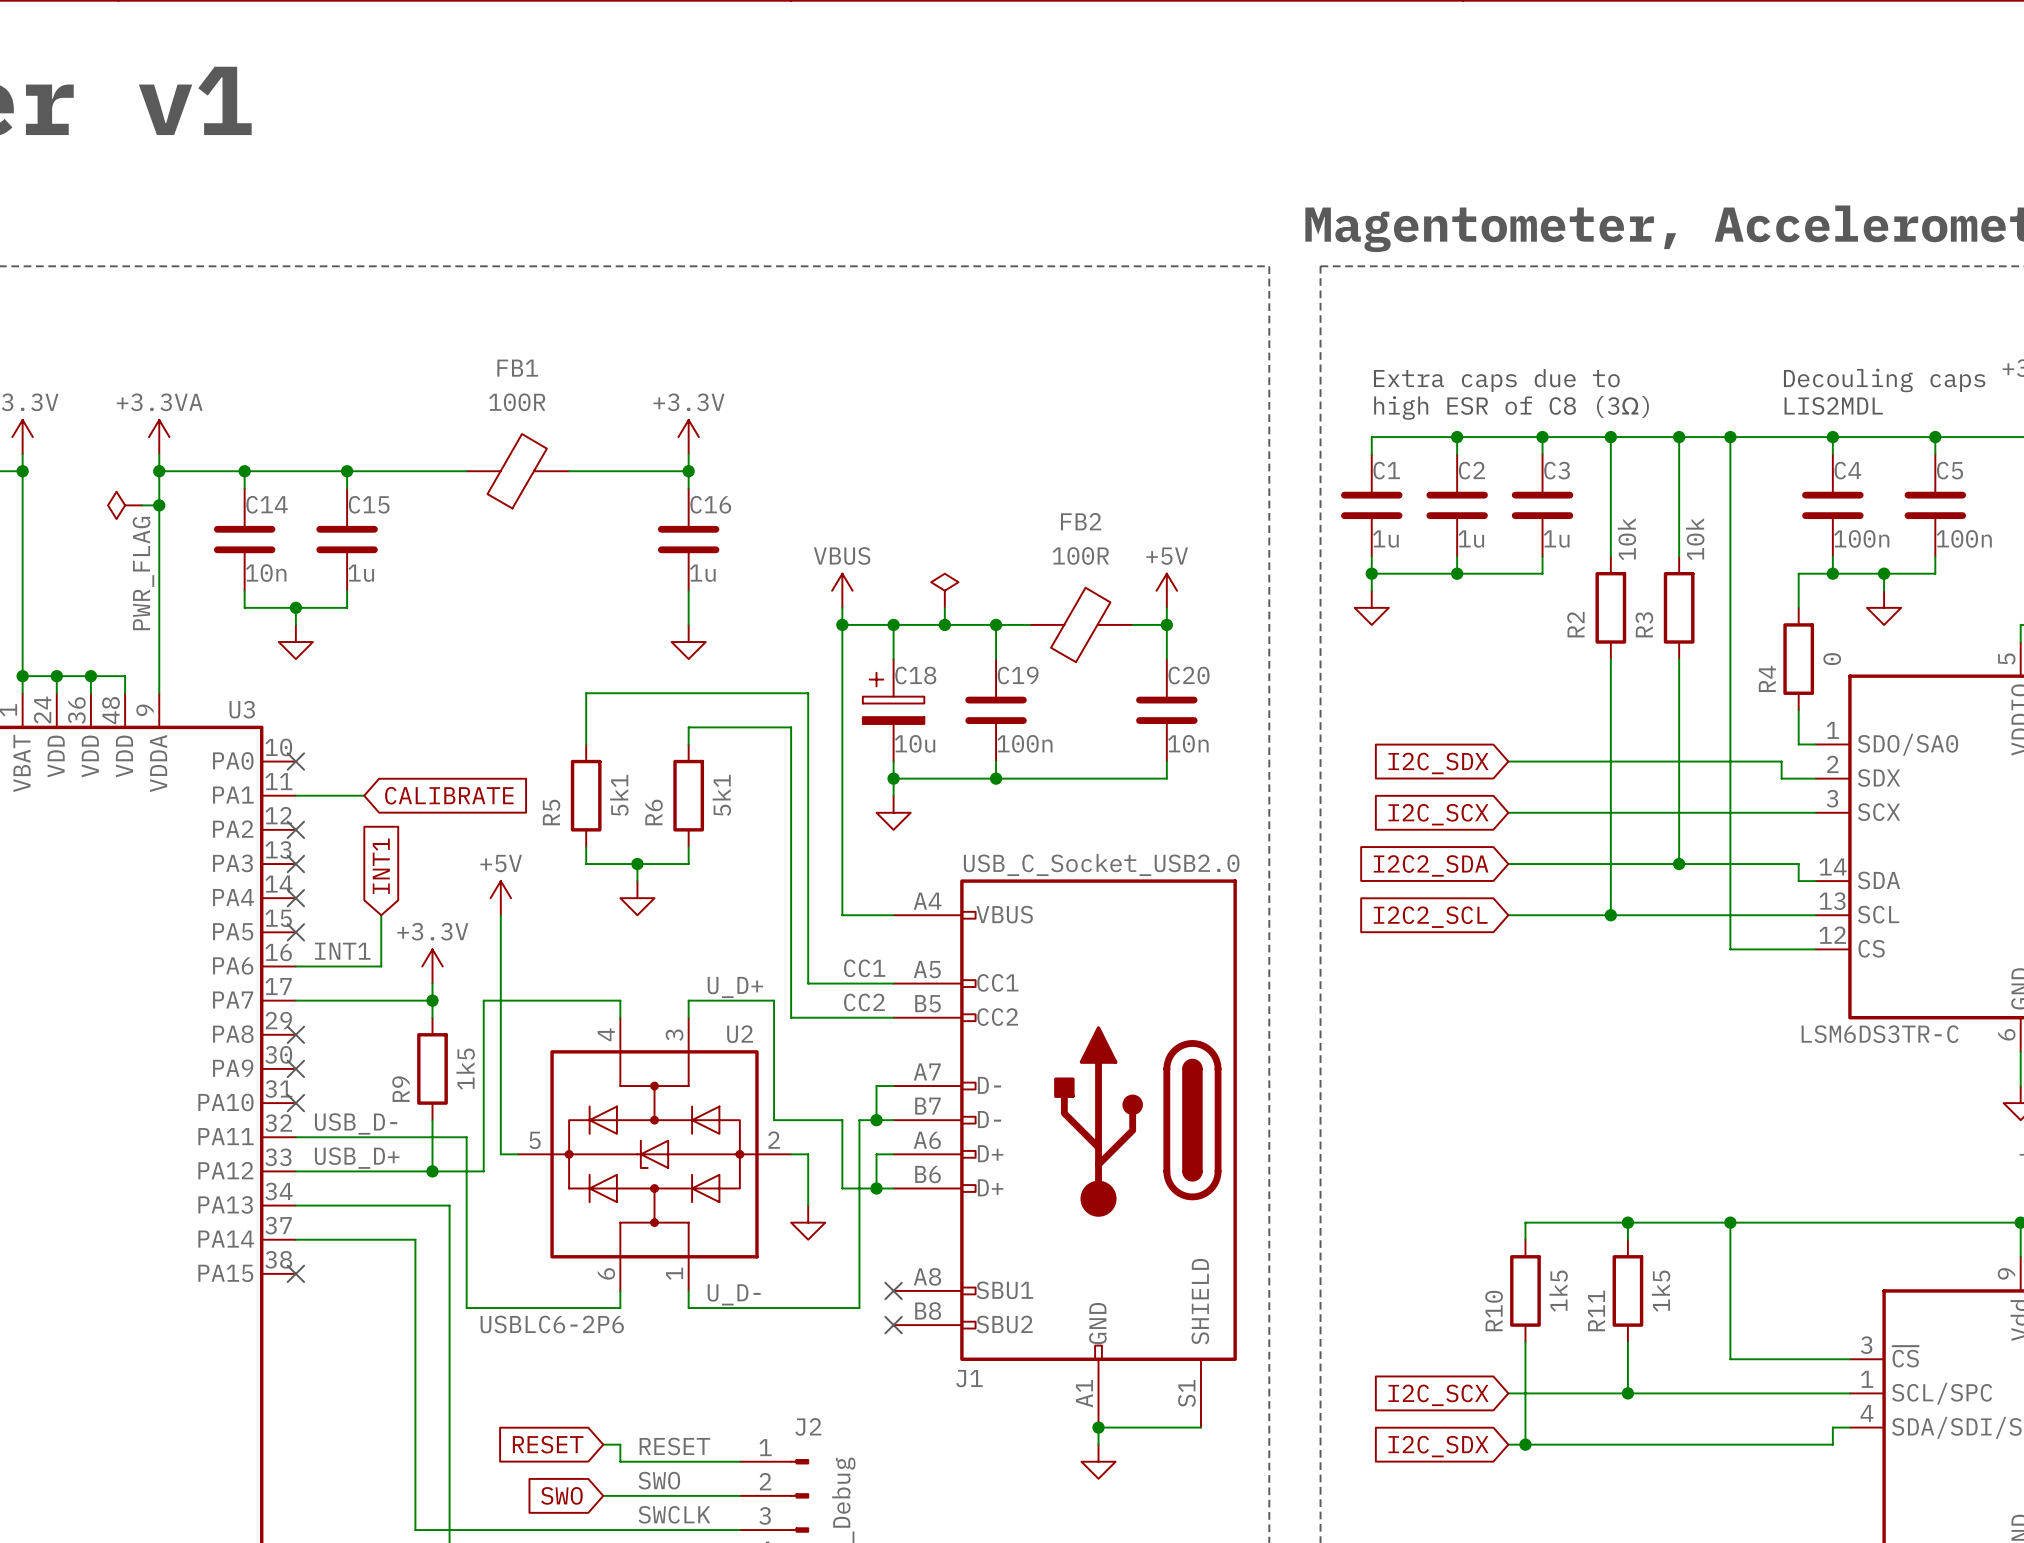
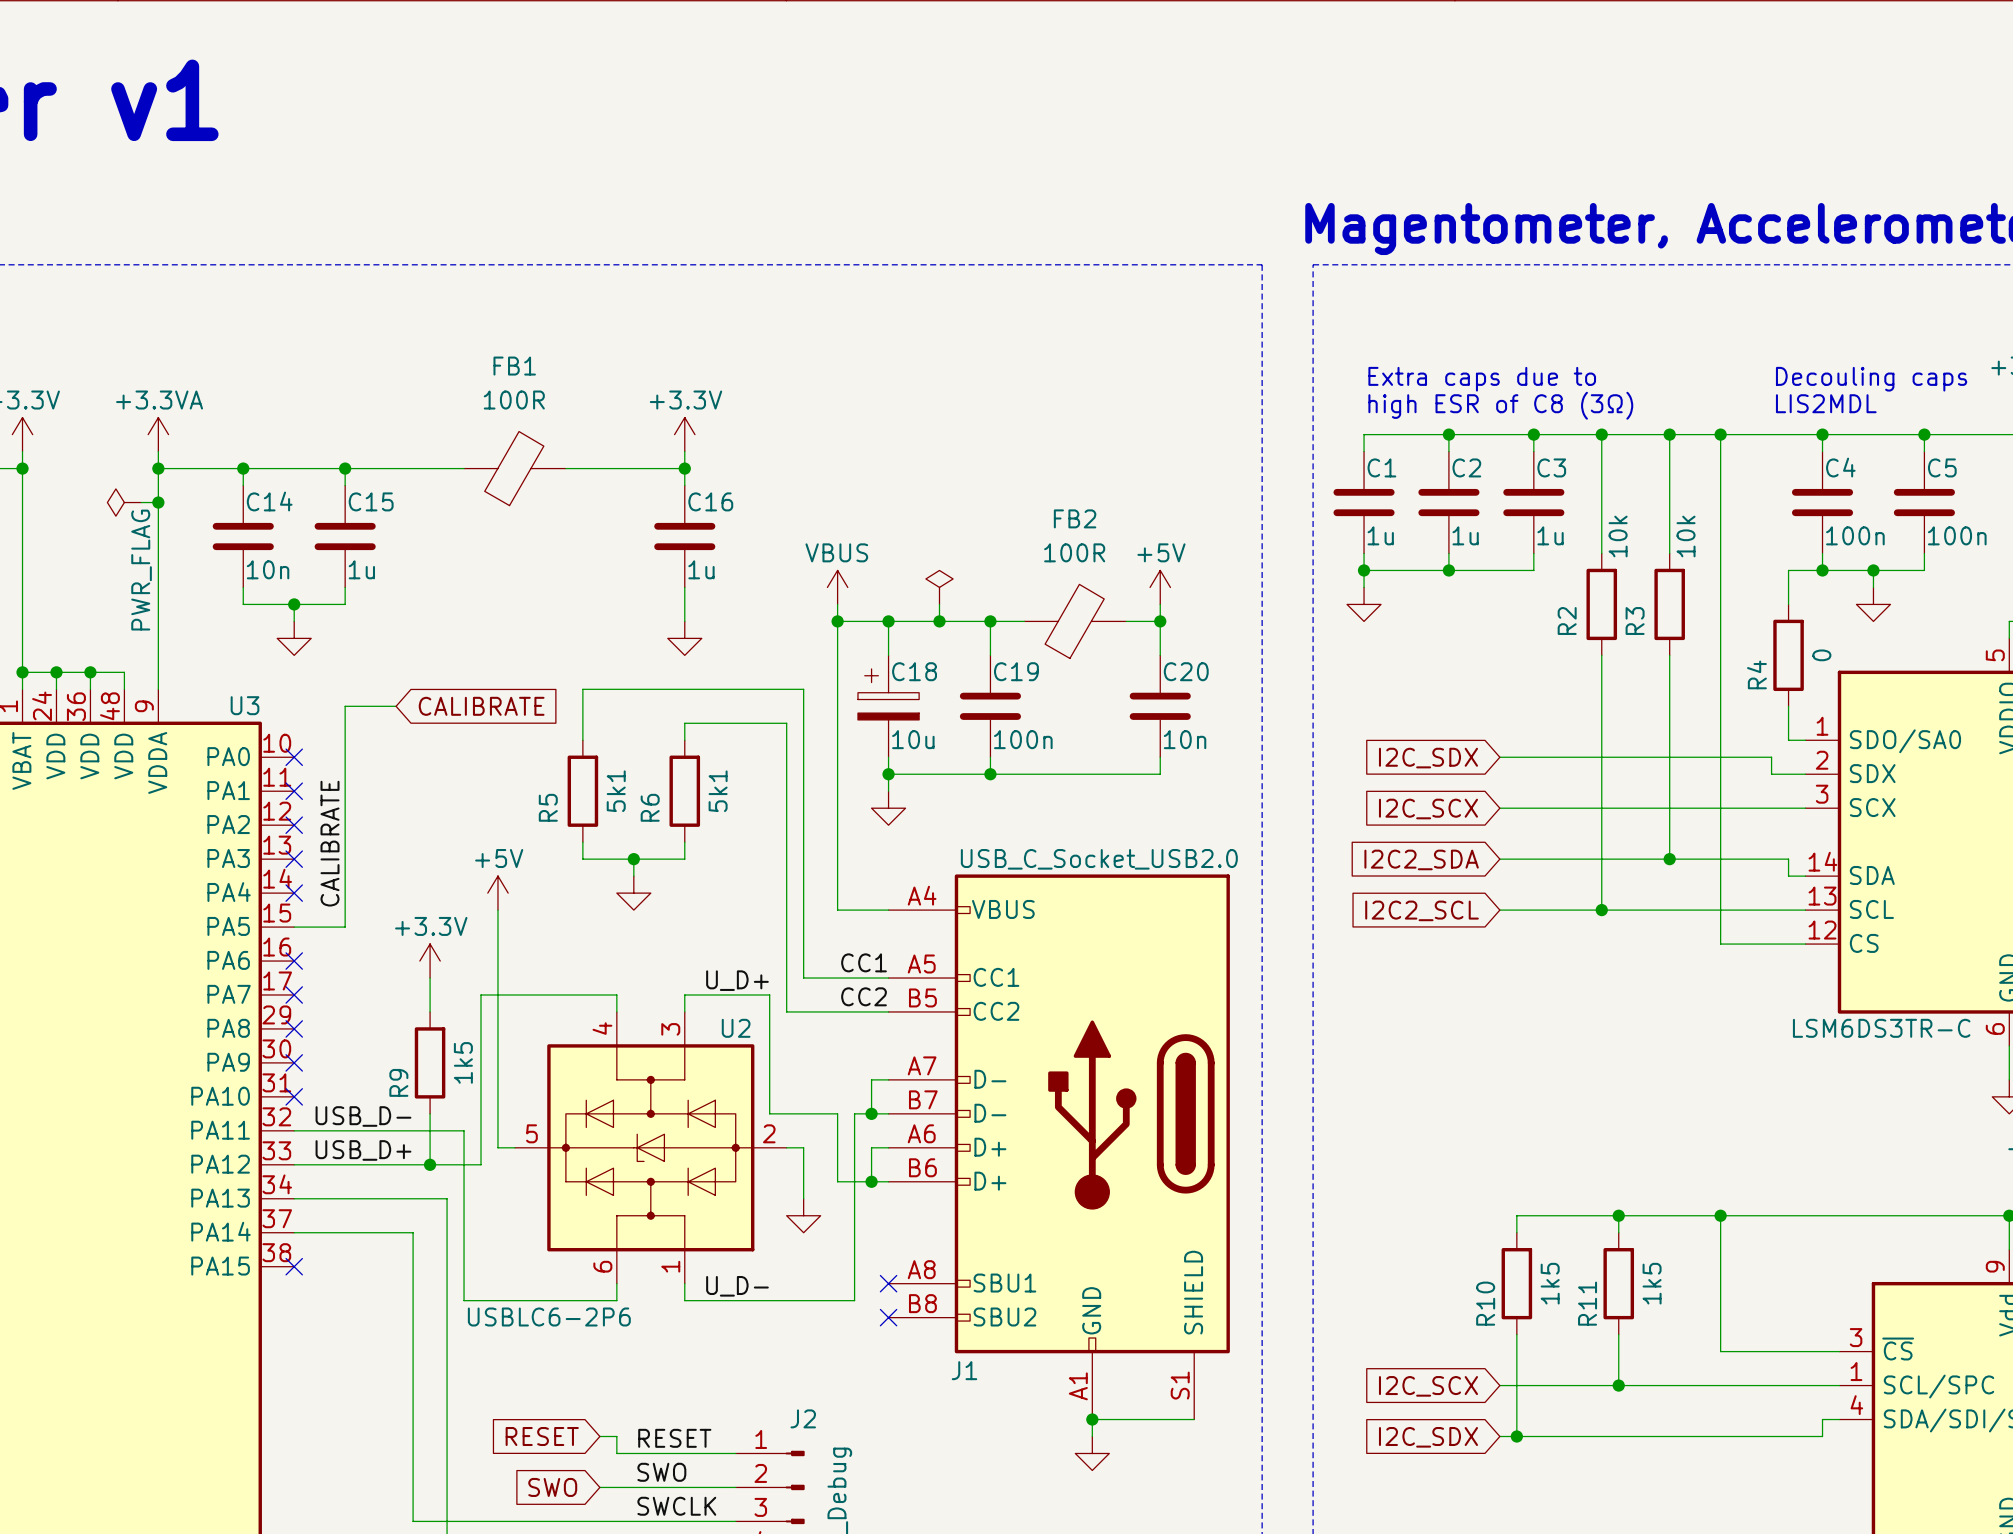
wire: none -> (396, 706) (345, 706) (345, 927) (294, 927)
wire: (295, 795) (364, 795) -> none
no-connect mark: none -> (294, 791)
global label position: CALIBRATE (449, 795) -> CALIBRATE (481, 706)
label: none -> CALIBRATE (330, 843)
global label: INT1 (381, 866) -> none
wire: (381, 915) (381, 966) (295, 966) -> none
no-connect mark: (295, 932) -> none
label: INT1 (342, 951) -> none
no-connect mark: none -> (294, 961)
wire: (295, 1000) (432, 1000) -> none
no-connect mark: none -> (294, 994)
junction: (432, 1000) -> none

